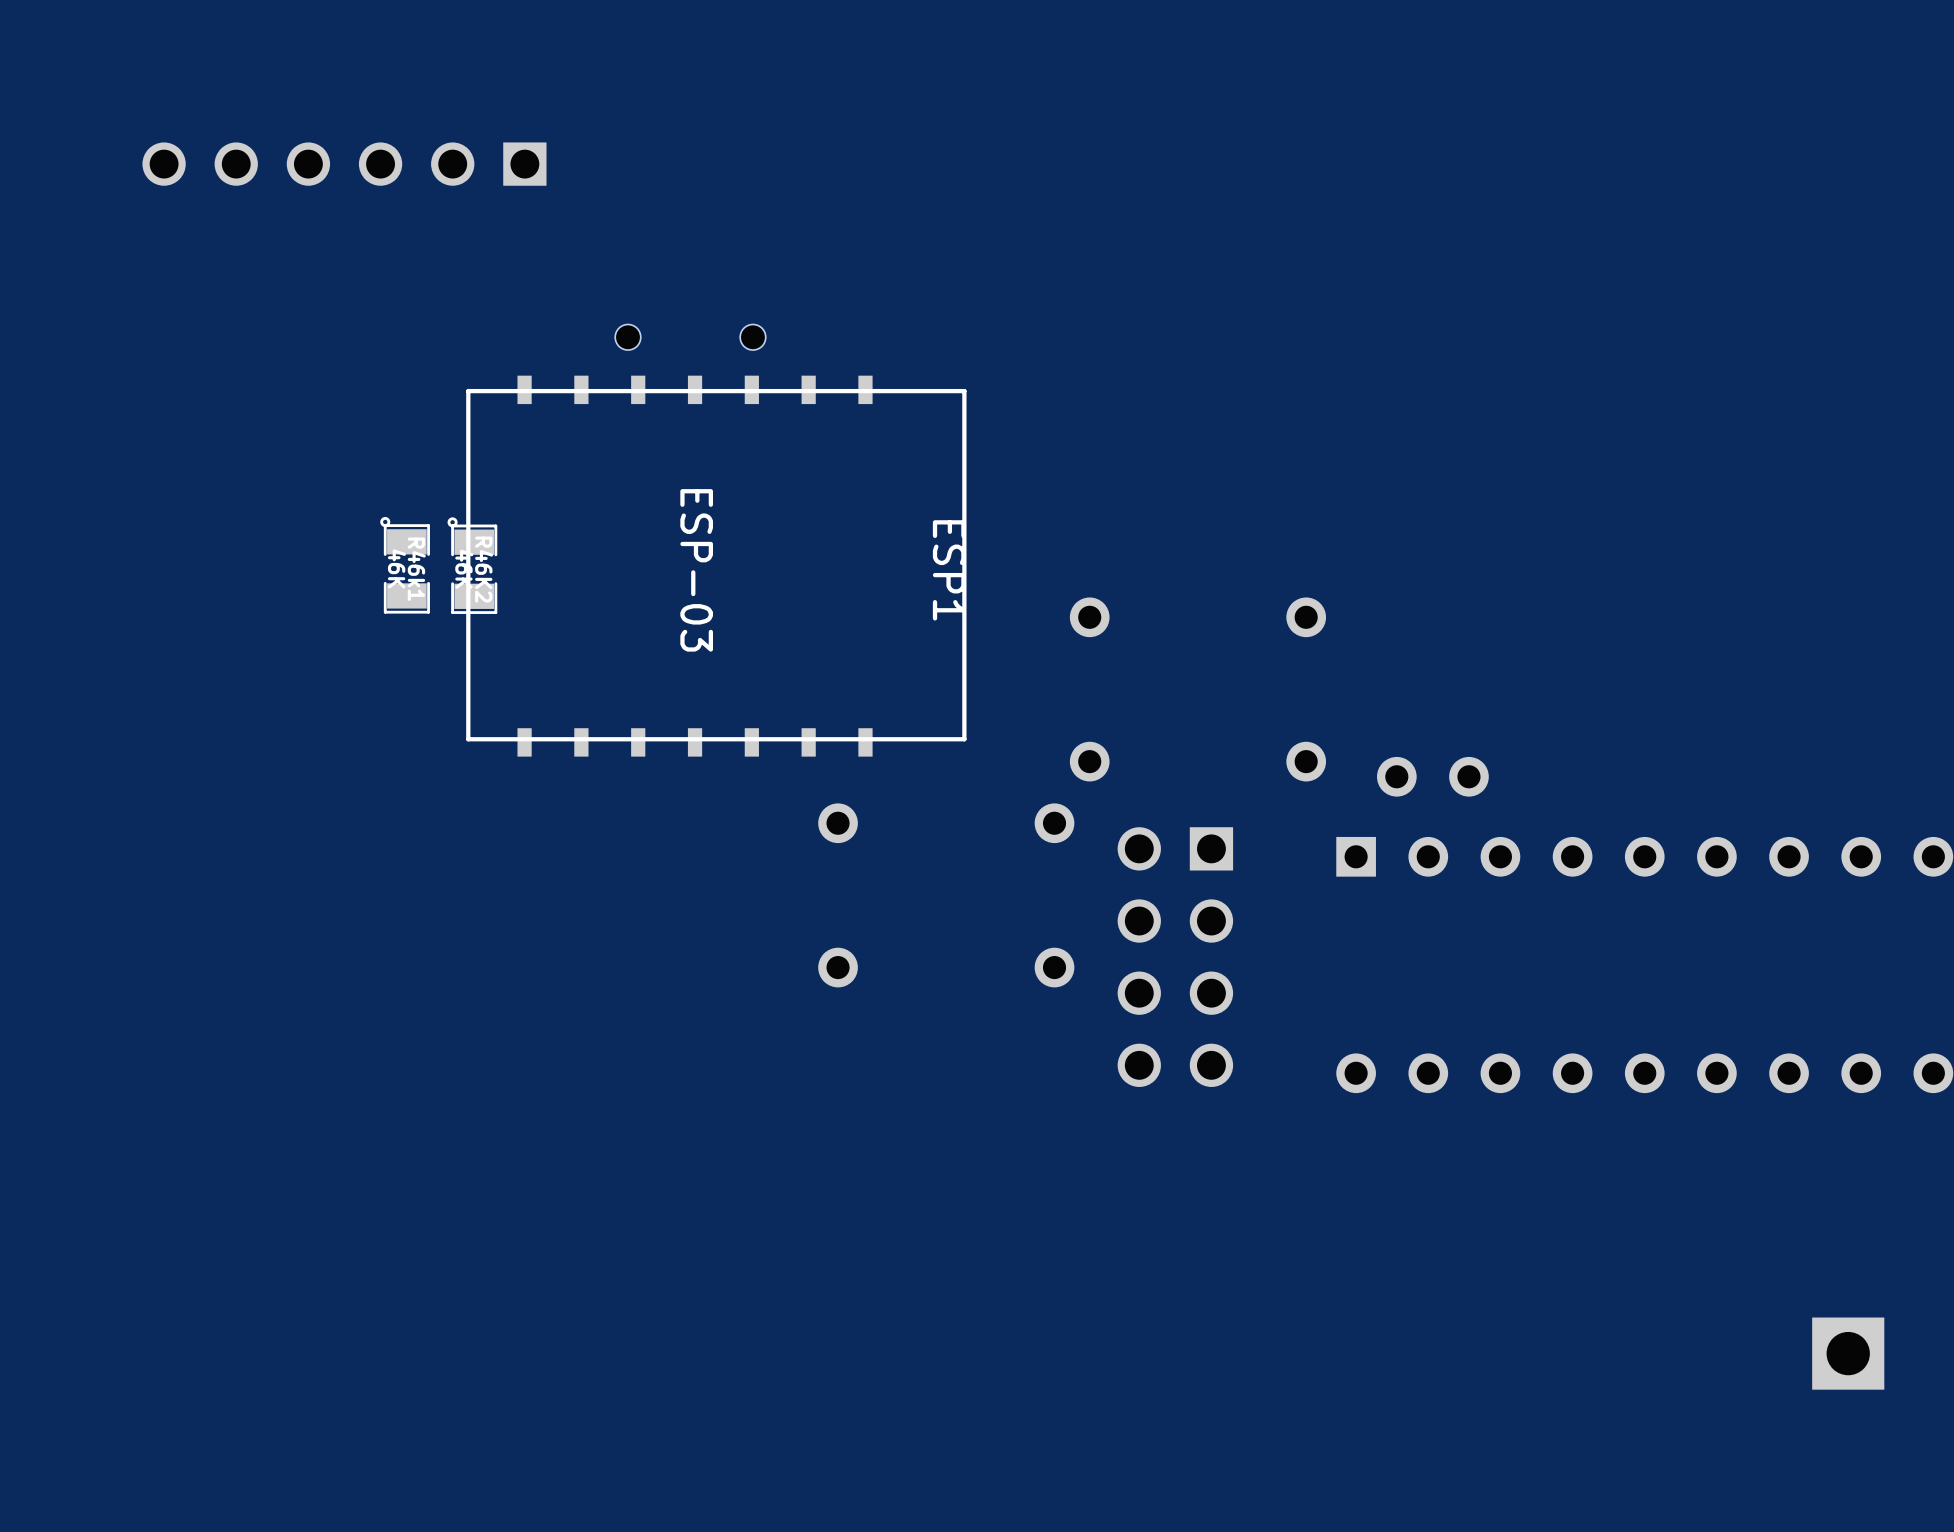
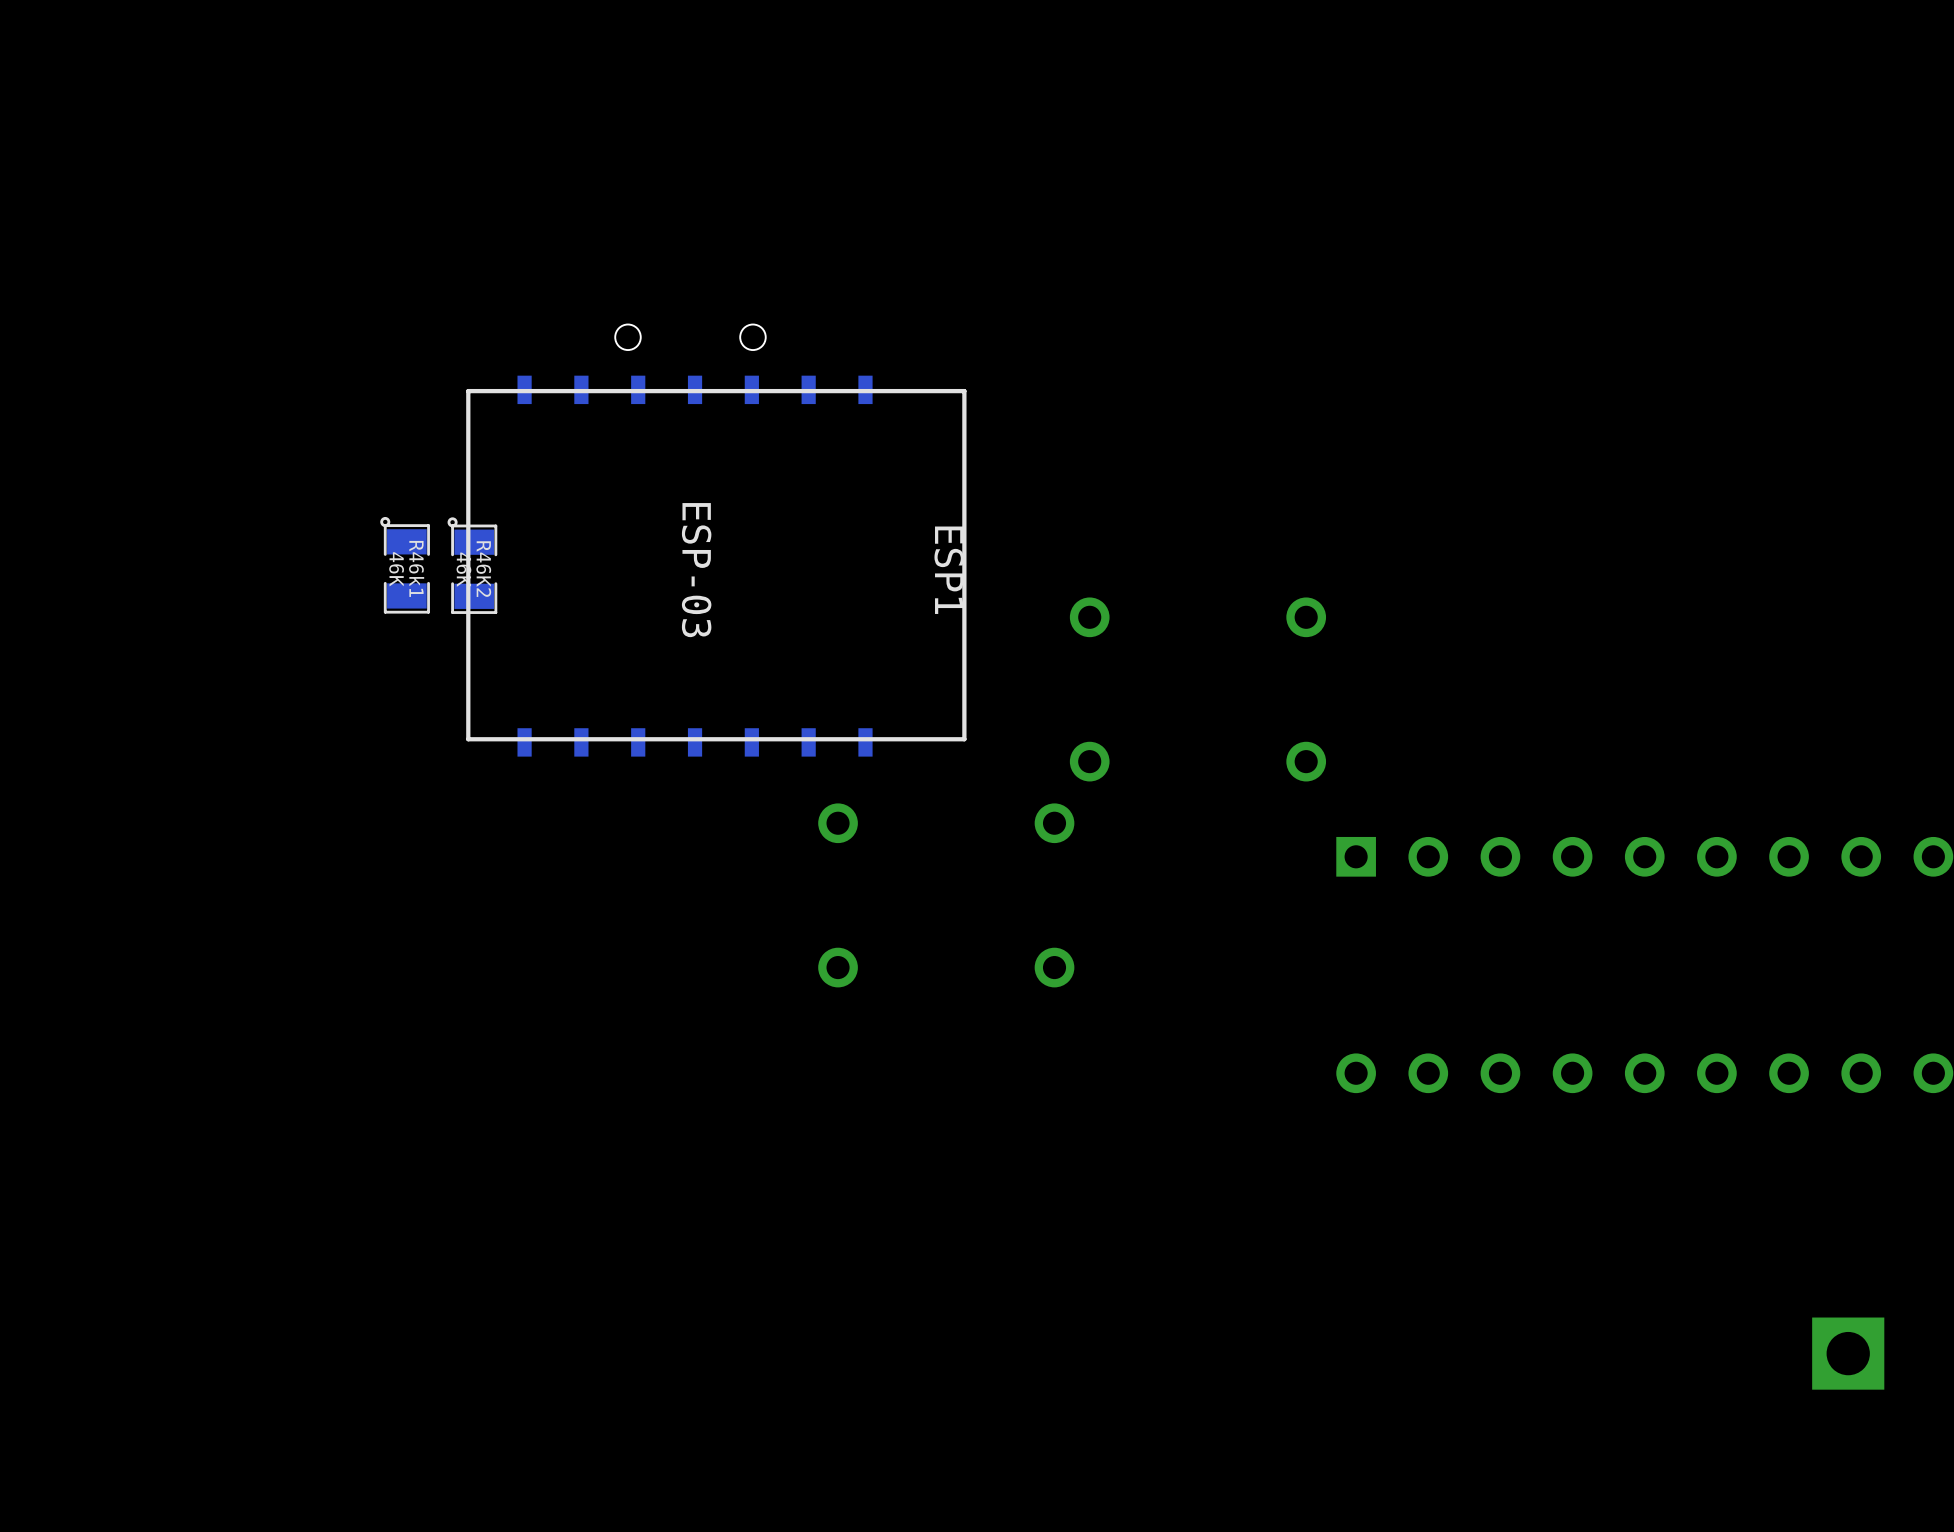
part: (344, 164) -> none
part: (1432, 776) -> none
part: (1175, 957) -> none

